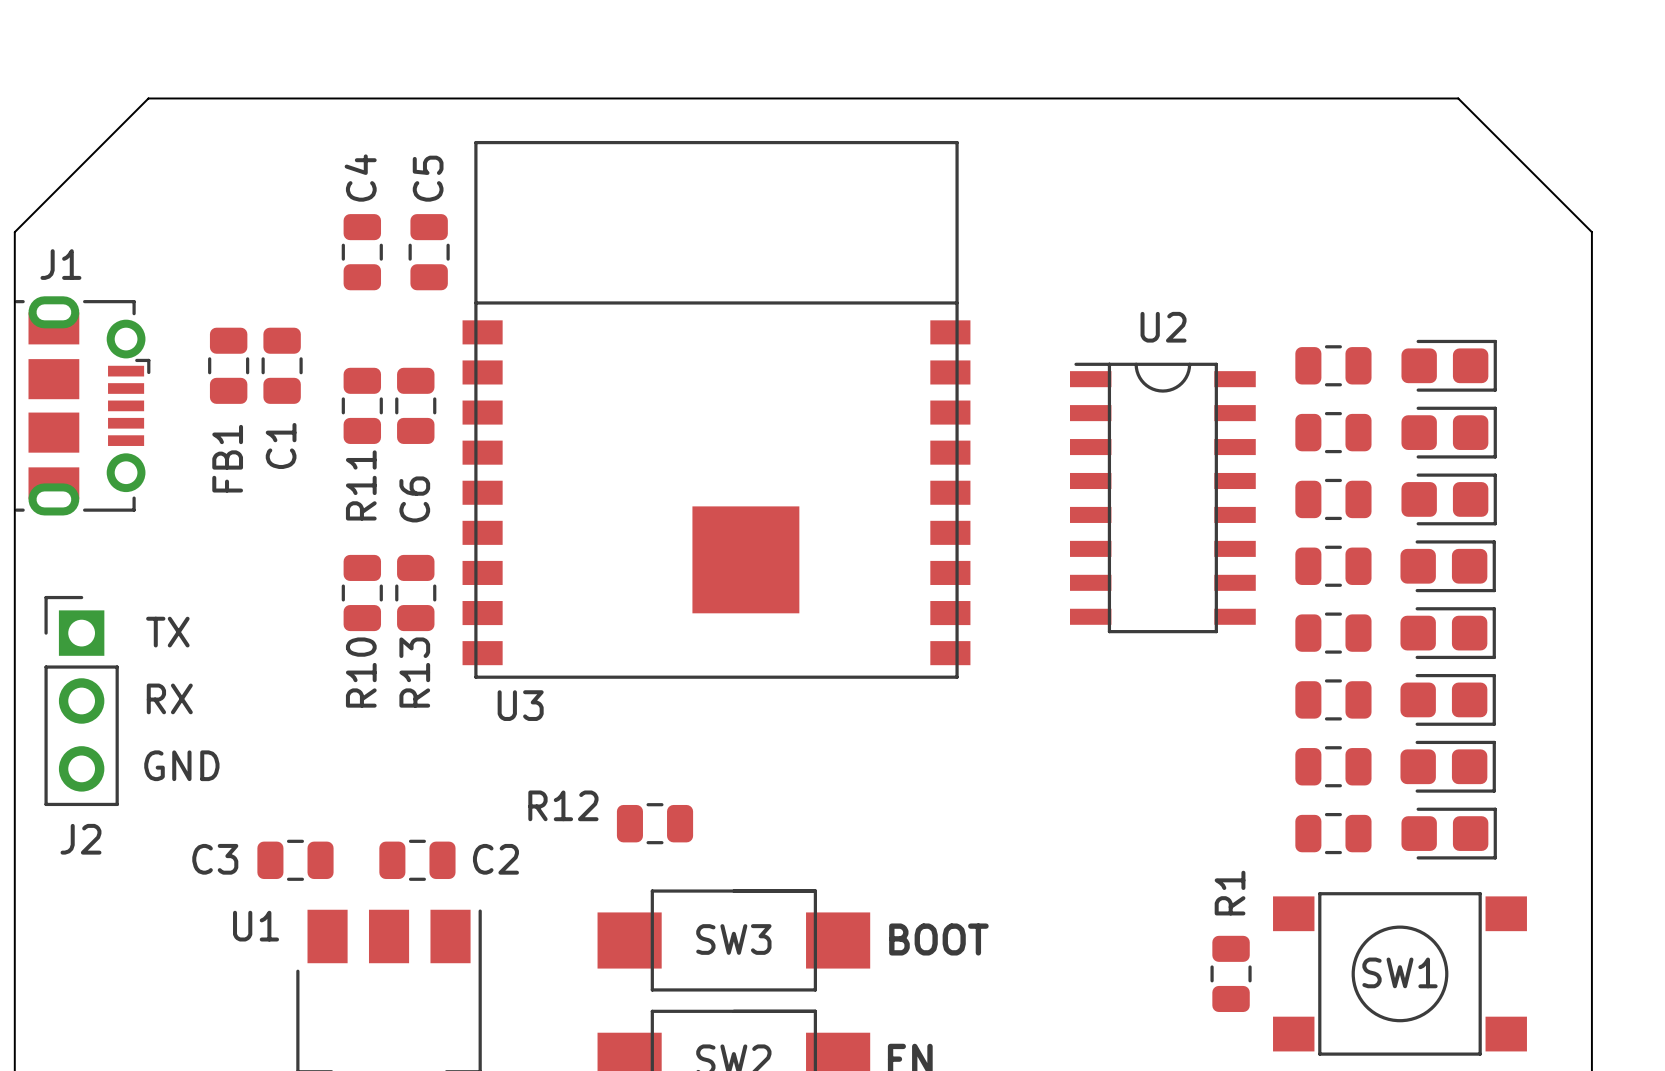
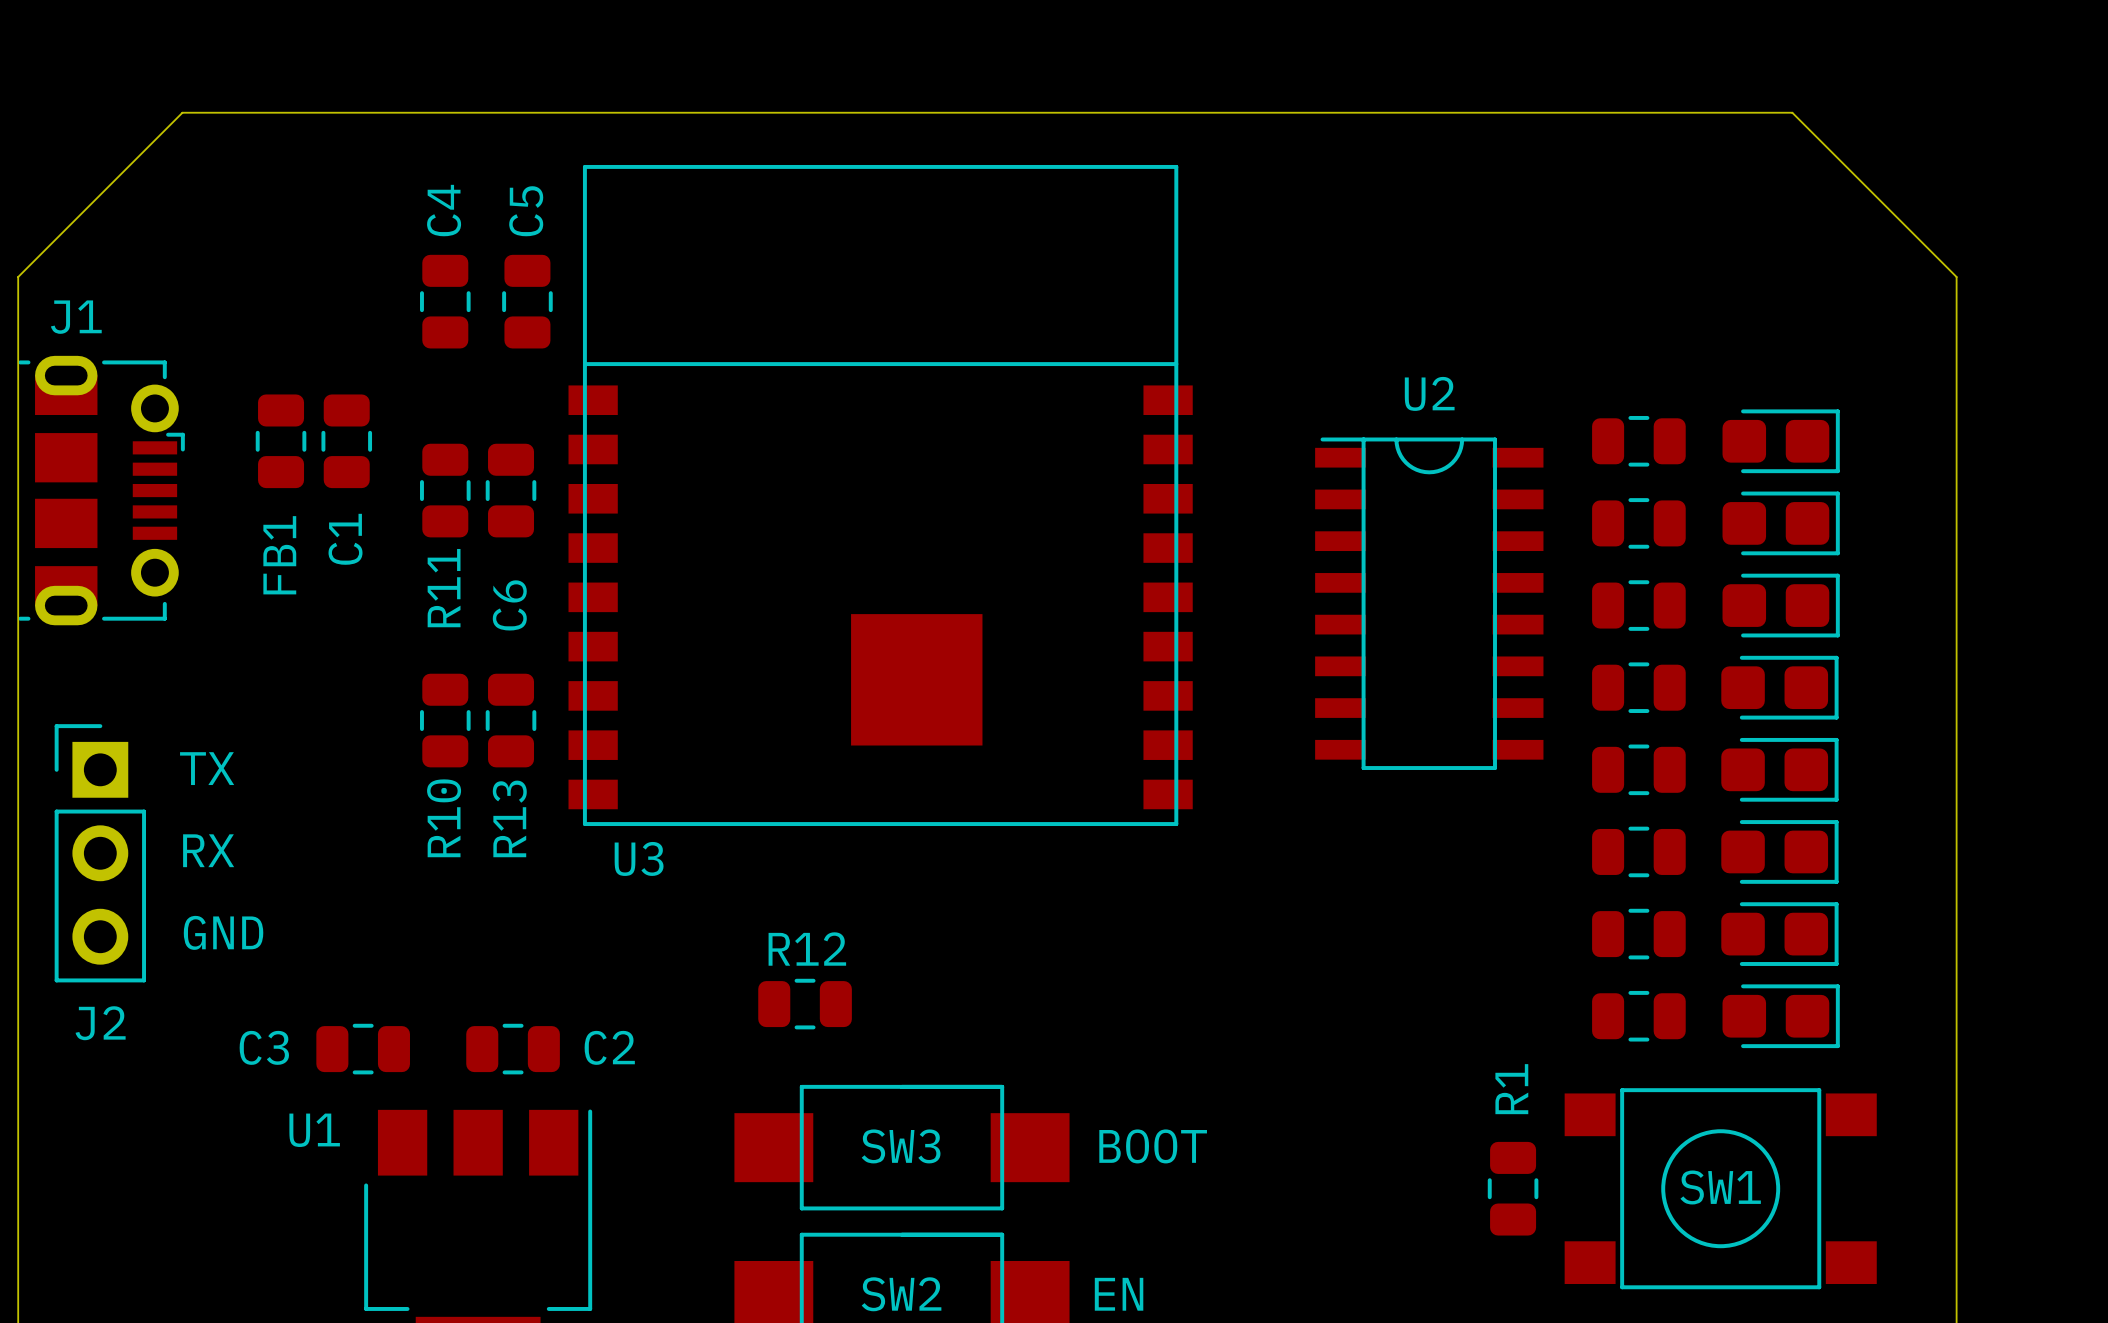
R12 name position: R12 (563, 805) -> R12 (807, 949)

